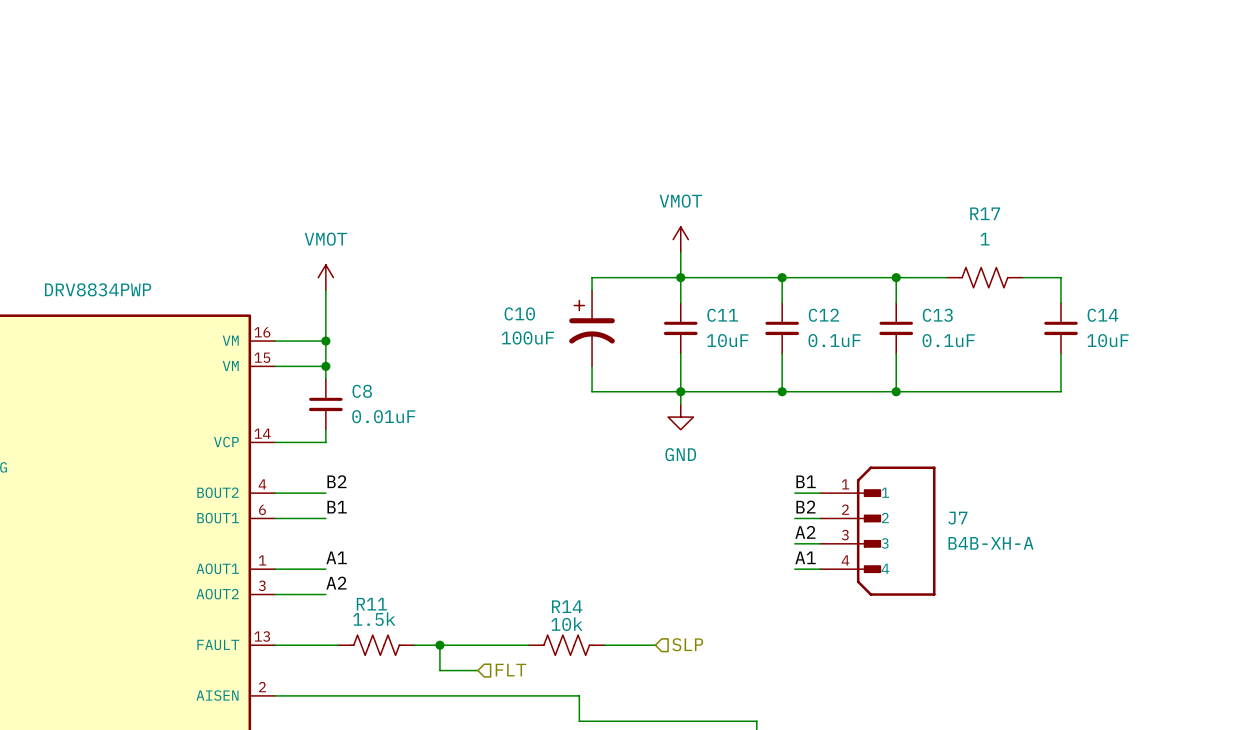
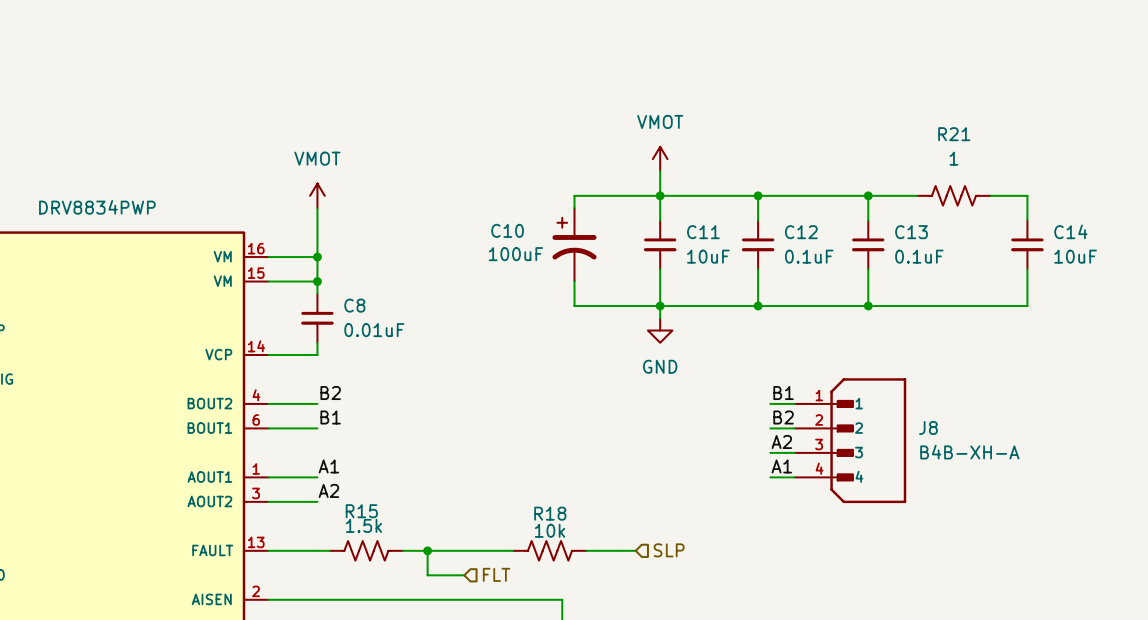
R17 name: R17 (985, 213) -> R21 (954, 134)
J7 name: J7 (957, 518) -> J8 (928, 427)
R11 name: R11 (371, 604) -> R15 (361, 511)
R14 name: R14 (567, 606) -> R18 (550, 513)

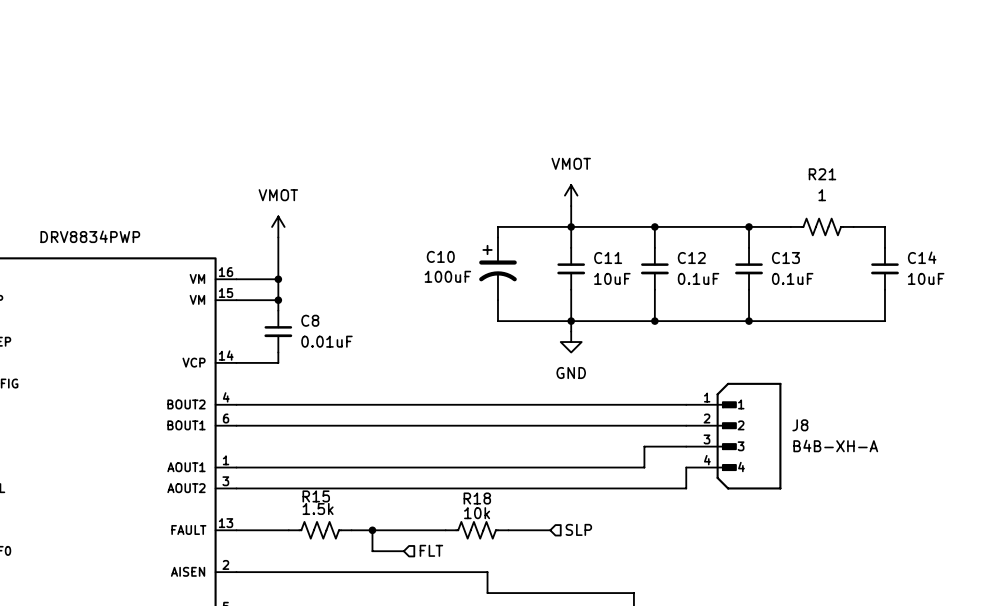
label: B2 (330, 393) -> none
label: B1 (783, 393) -> none
wire: none -> (278, 404) (665, 404)
label: B1 (330, 417) -> none
label: B2 (783, 417) -> none
wire: none -> (278, 425) (665, 425)
label: A2 (781, 441) -> none
wire: none -> (665, 446) (644, 446) (644, 467) (278, 467)
label: A1 (328, 466) -> none
label: A1 (781, 466) -> none
wire: (770, 477) (794, 477) -> (278, 488) (686, 488) (686, 467)
label: A2 (328, 490) -> none

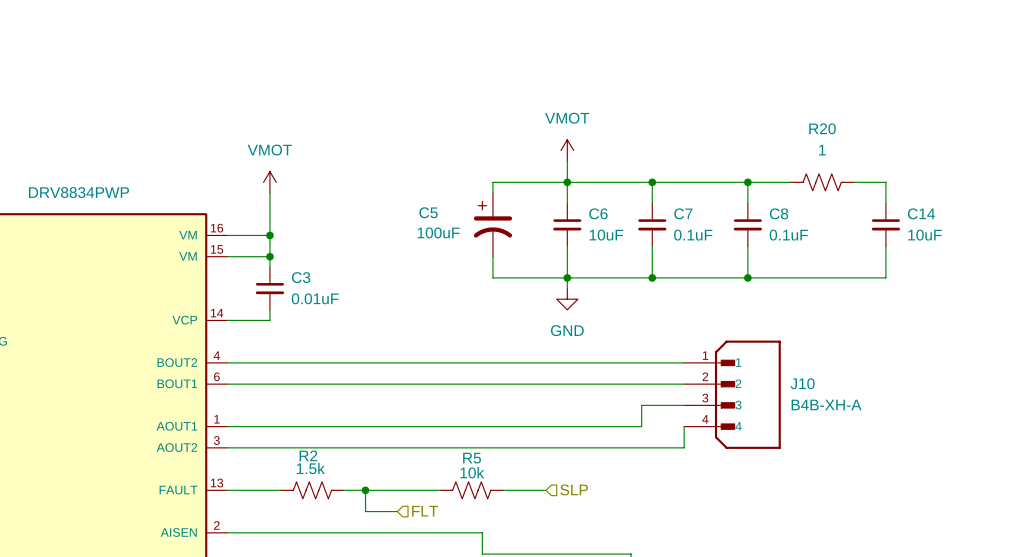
R21 name: R21 (822, 174) -> R20 (822, 128)
C10 name: C10 (440, 256) -> C5 (428, 212)
C11 name: C11 (608, 258) -> C6 (598, 213)
C12 name: C12 (691, 258) -> C7 (683, 213)
C13 name: C13 (785, 258) -> C8 (779, 213)
C8 name: C8 (310, 320) -> C3 (301, 277)
J8 name: J8 (800, 425) -> J10 (802, 383)
R15 name: R15 (316, 496) -> R2 (308, 455)
R18 name: R18 (477, 498) -> R5 (472, 458)

